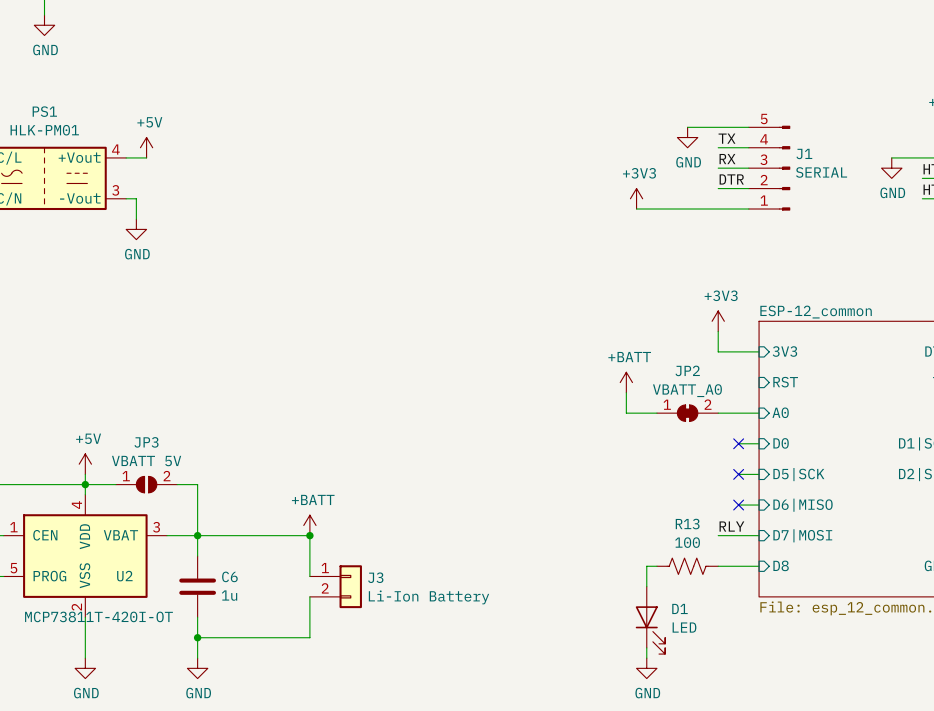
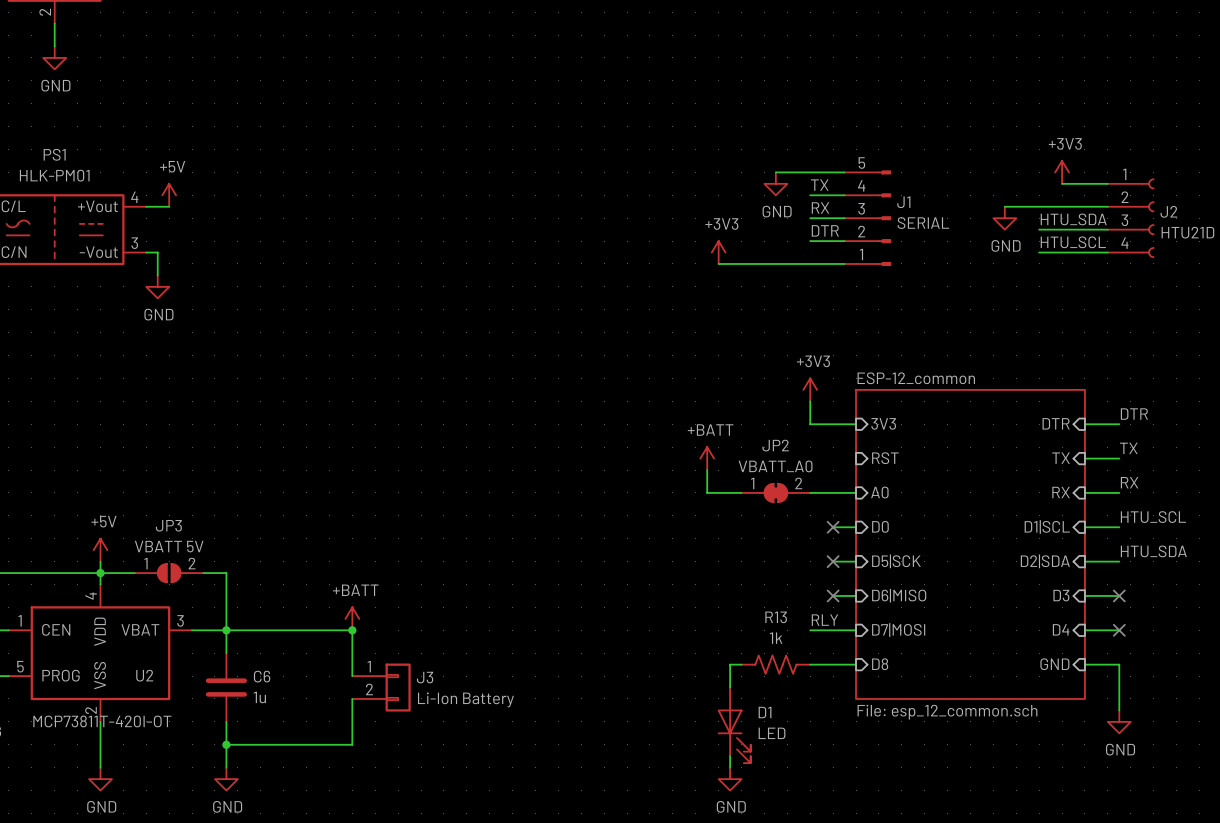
R13 value: 100 (687, 542) -> 1k (776, 638)

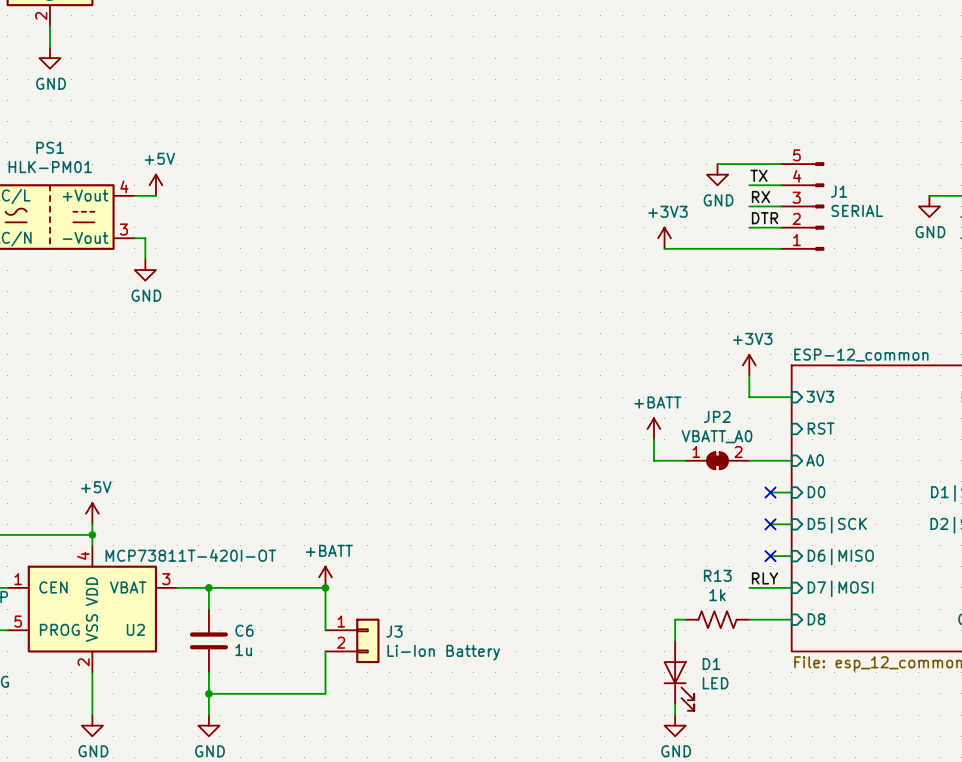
wire: (100, 573) (134, 573) -> none
JP3: VBATT 5V (169, 573) -> none
wire: (203, 573) (226, 573) (226, 630) -> none
U2 value position: MCP73811T-420I-OT (102, 721) -> MCP73811T-420I-OT (190, 555)

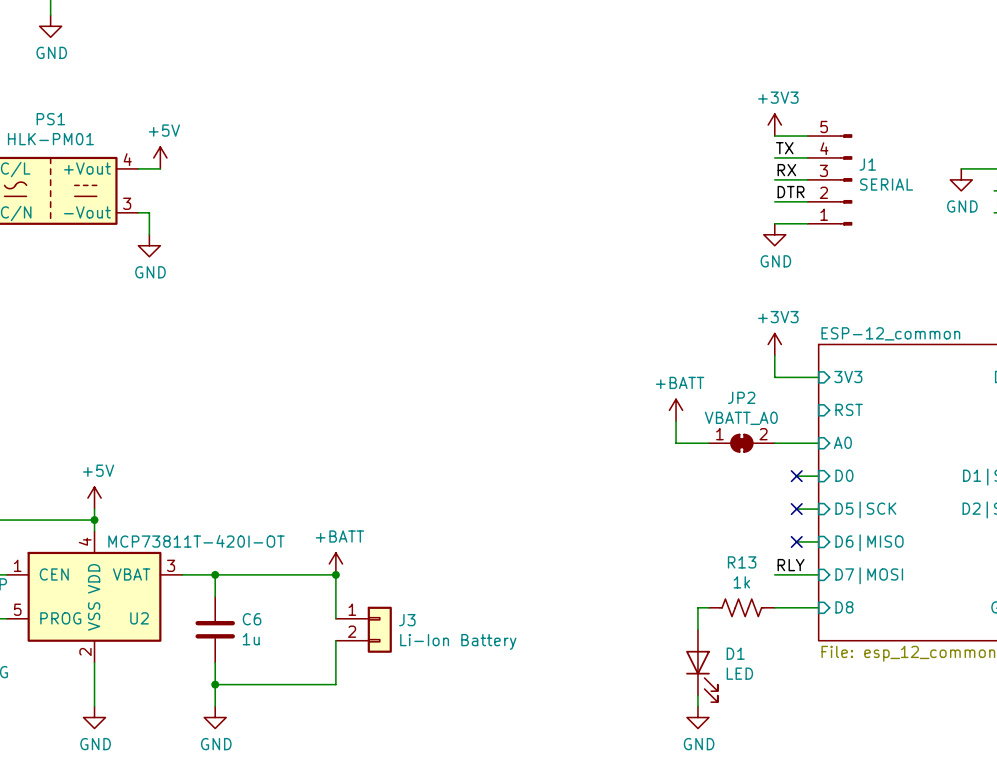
wire: (717, 164) (749, 164) -> none
power symbol position: GND (717, 174) -> GND (774, 234)
power symbol position: +3V3 (664, 238) -> +3V3 (774, 125)
wire: (664, 248) (749, 248) -> none

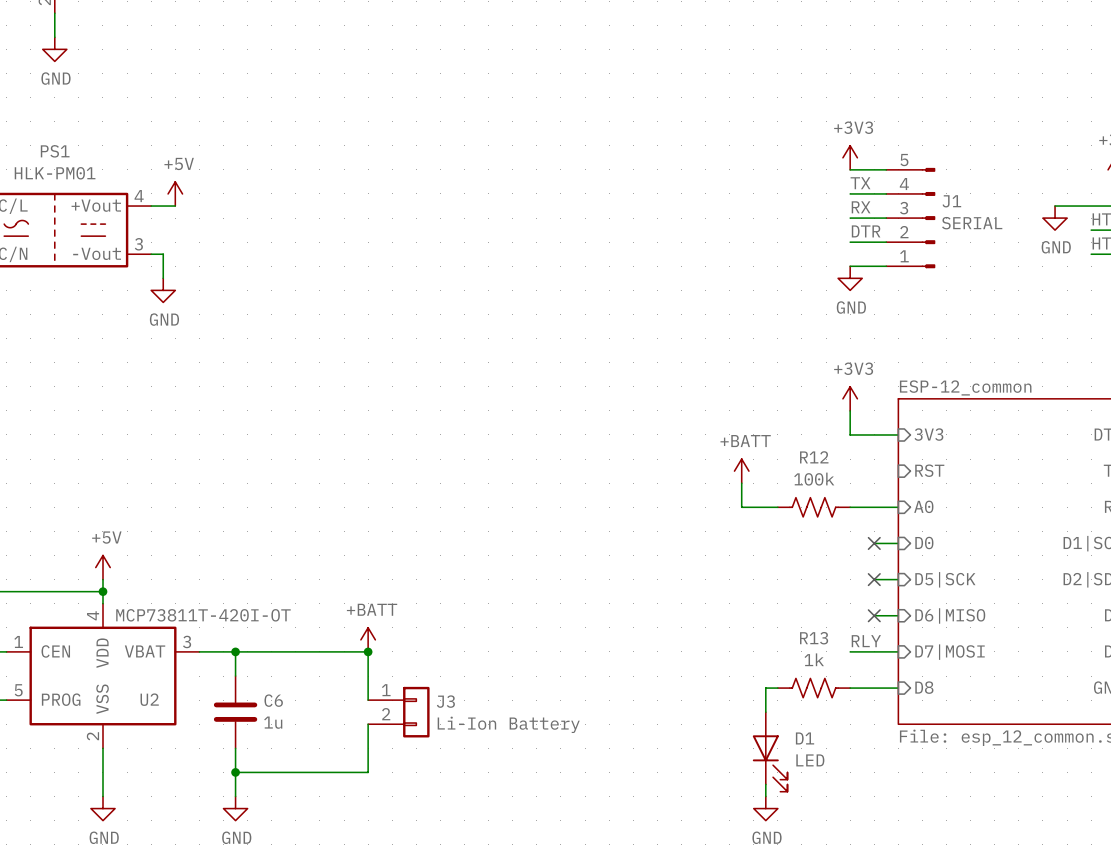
JP2: VBATT_A0 (741, 443) -> none
R12: none -> 100k (814, 507)

